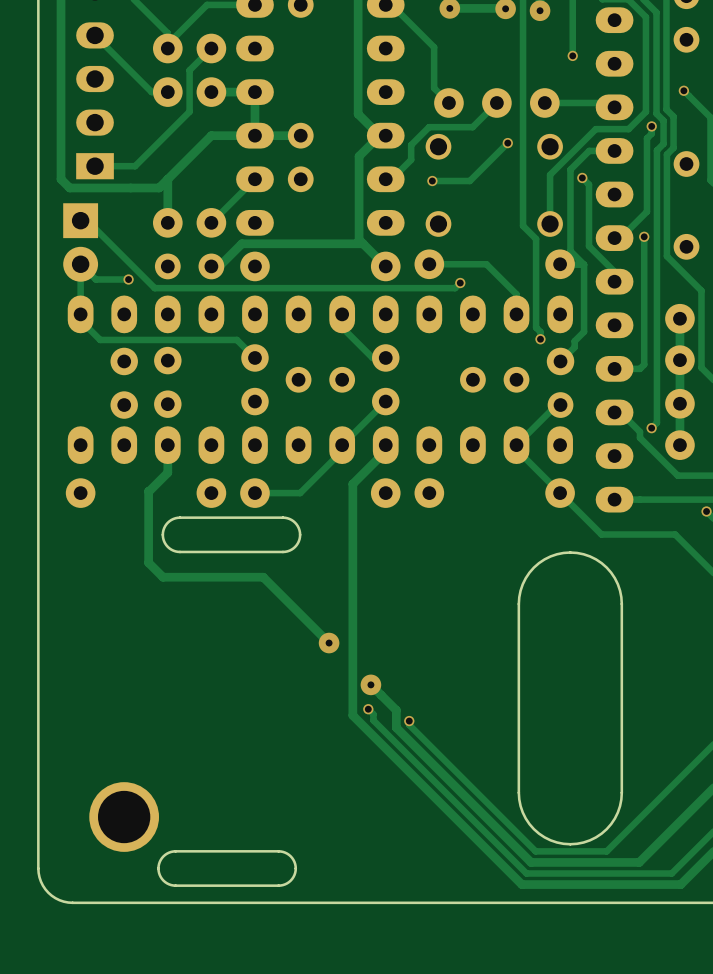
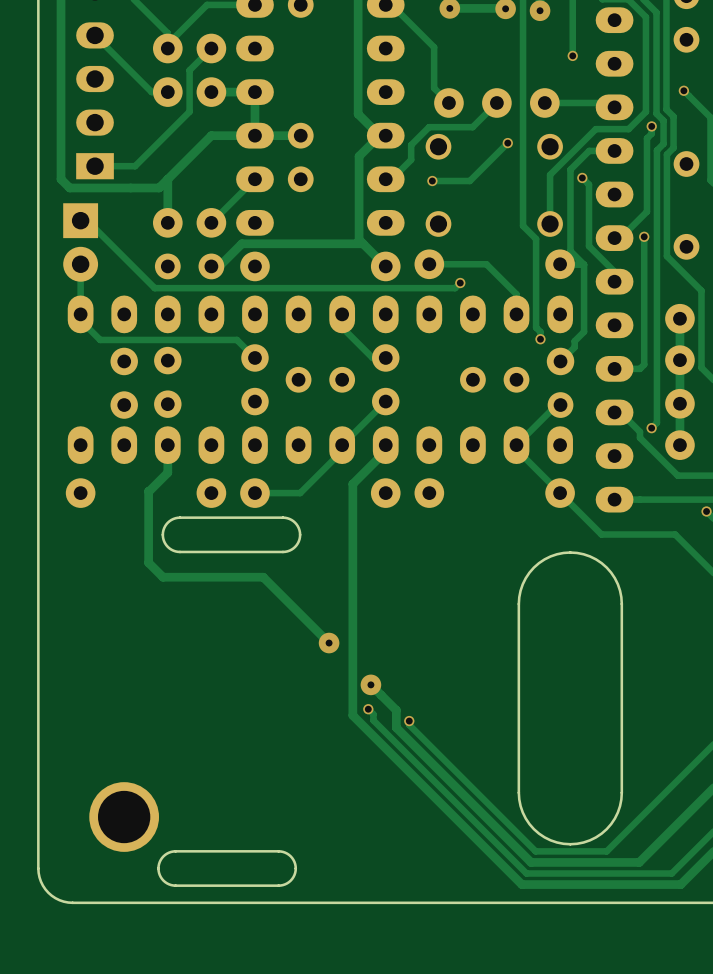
track: (80, 264) (95, 279) (128, 279) -> none
via: (128, 279) -> none

